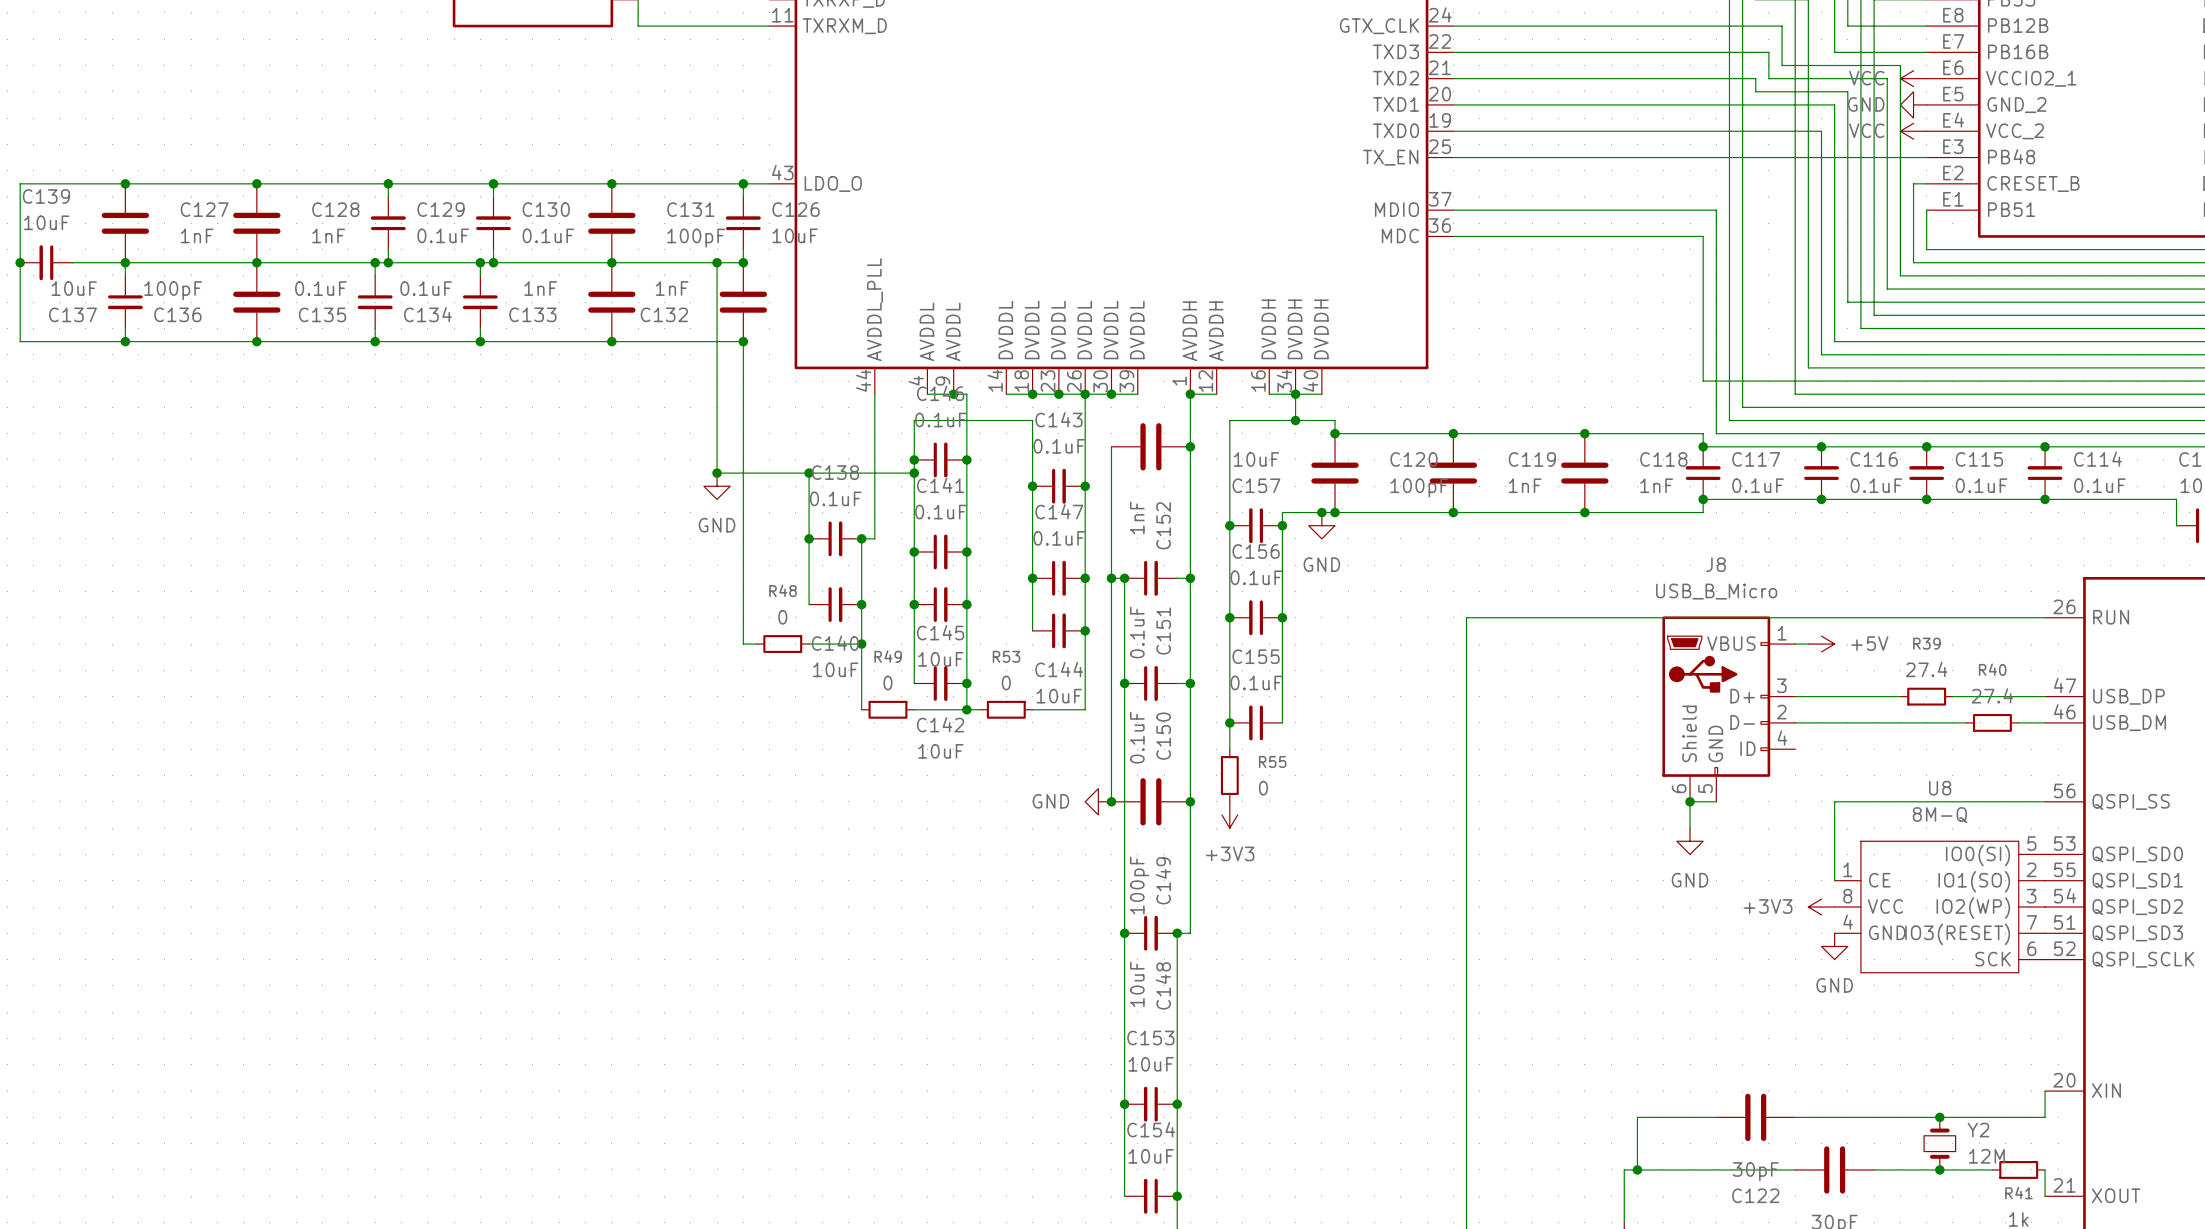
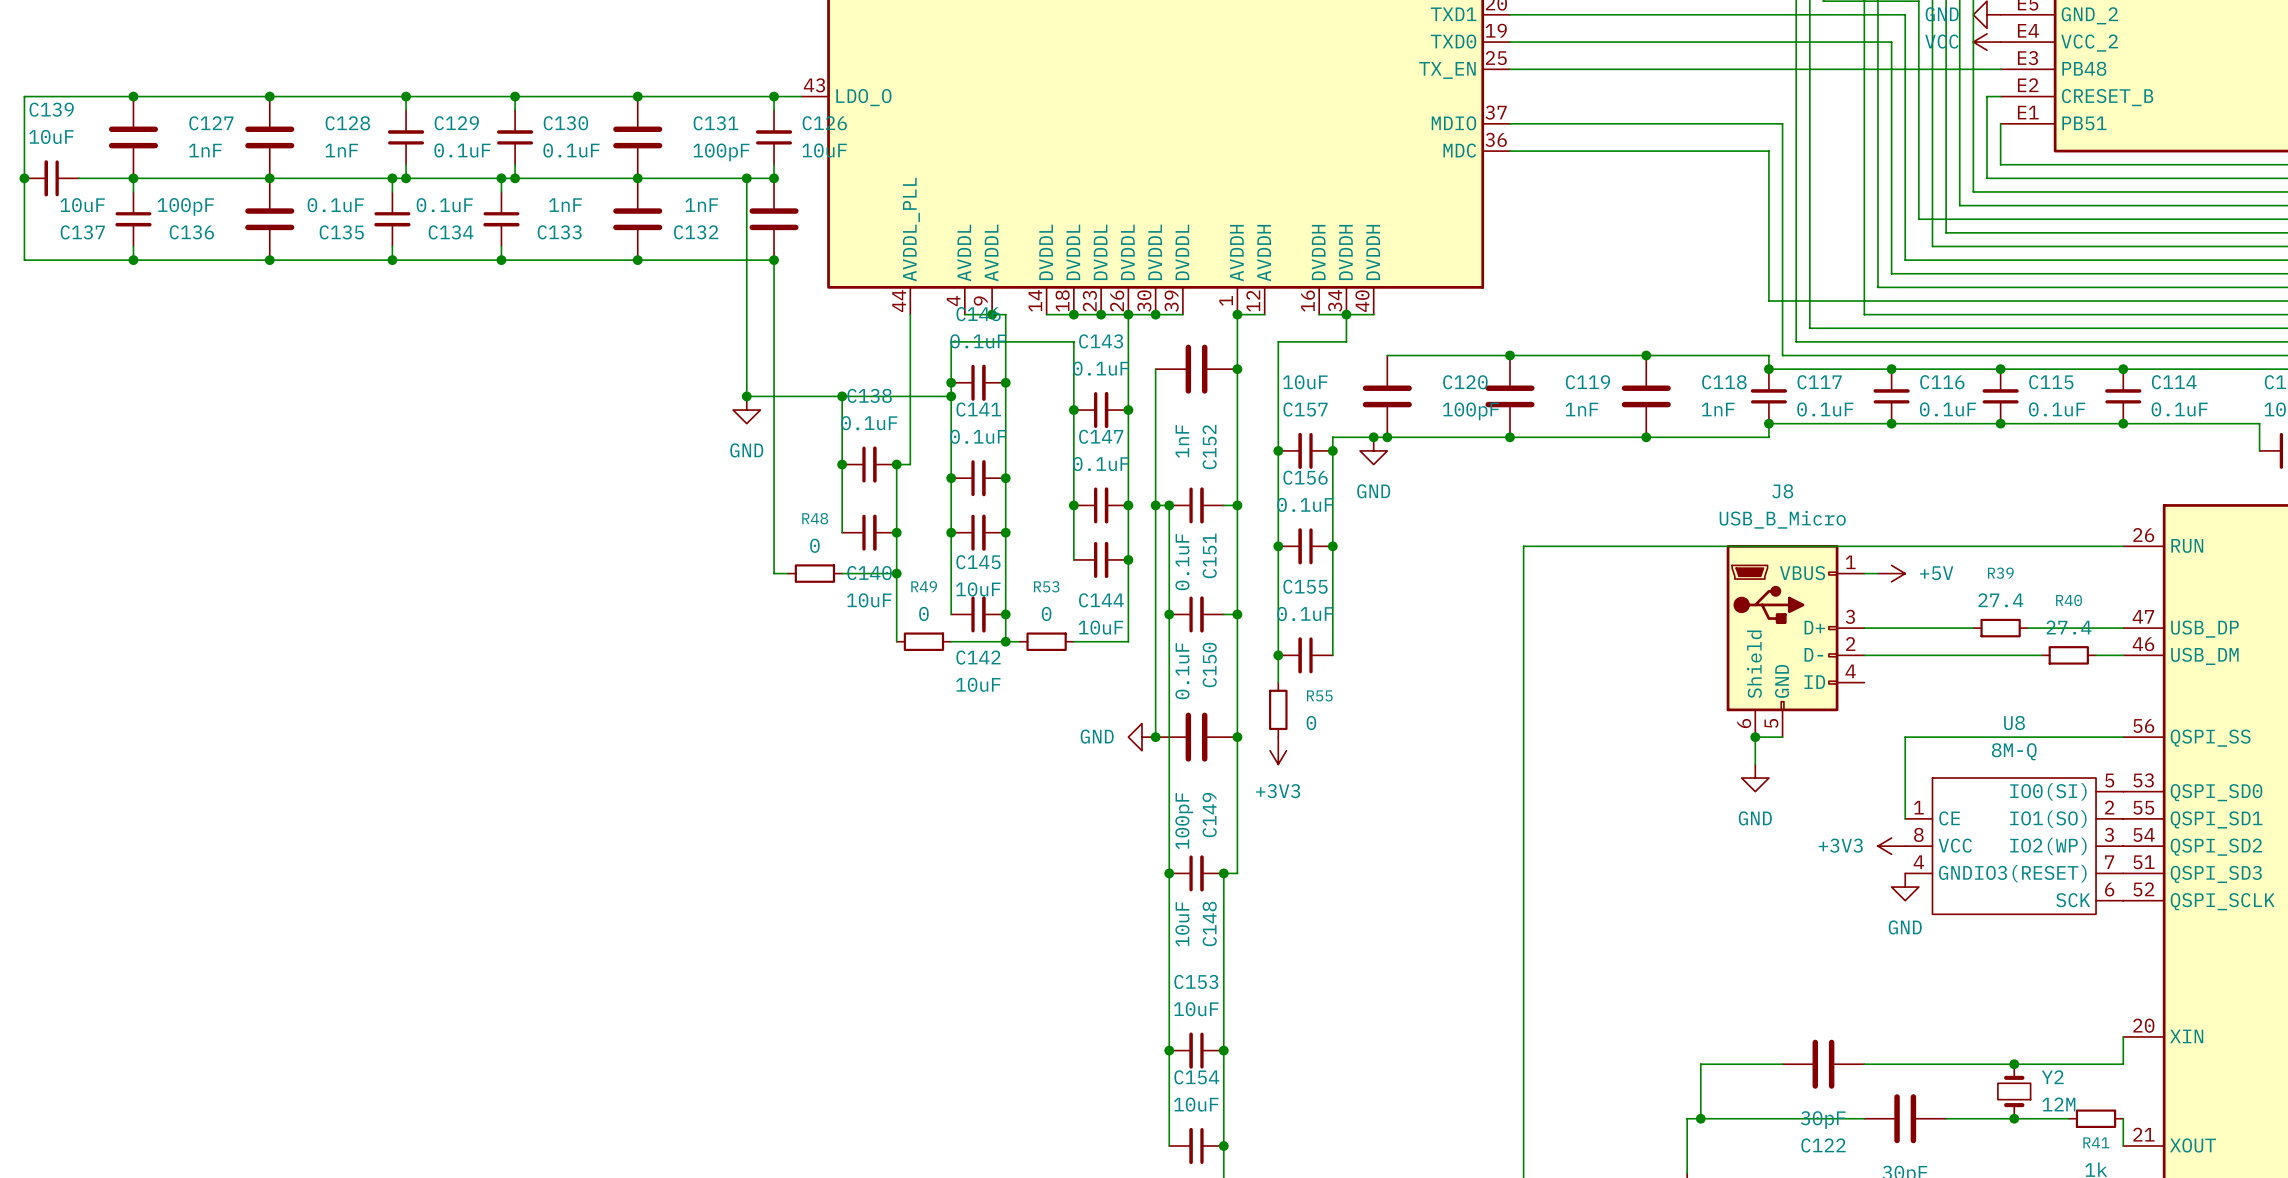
wire: (1295, 420) (1335, 420) (1335, 433) -> none
junction: (1295, 420) -> none
junction: (1335, 433) -> none

